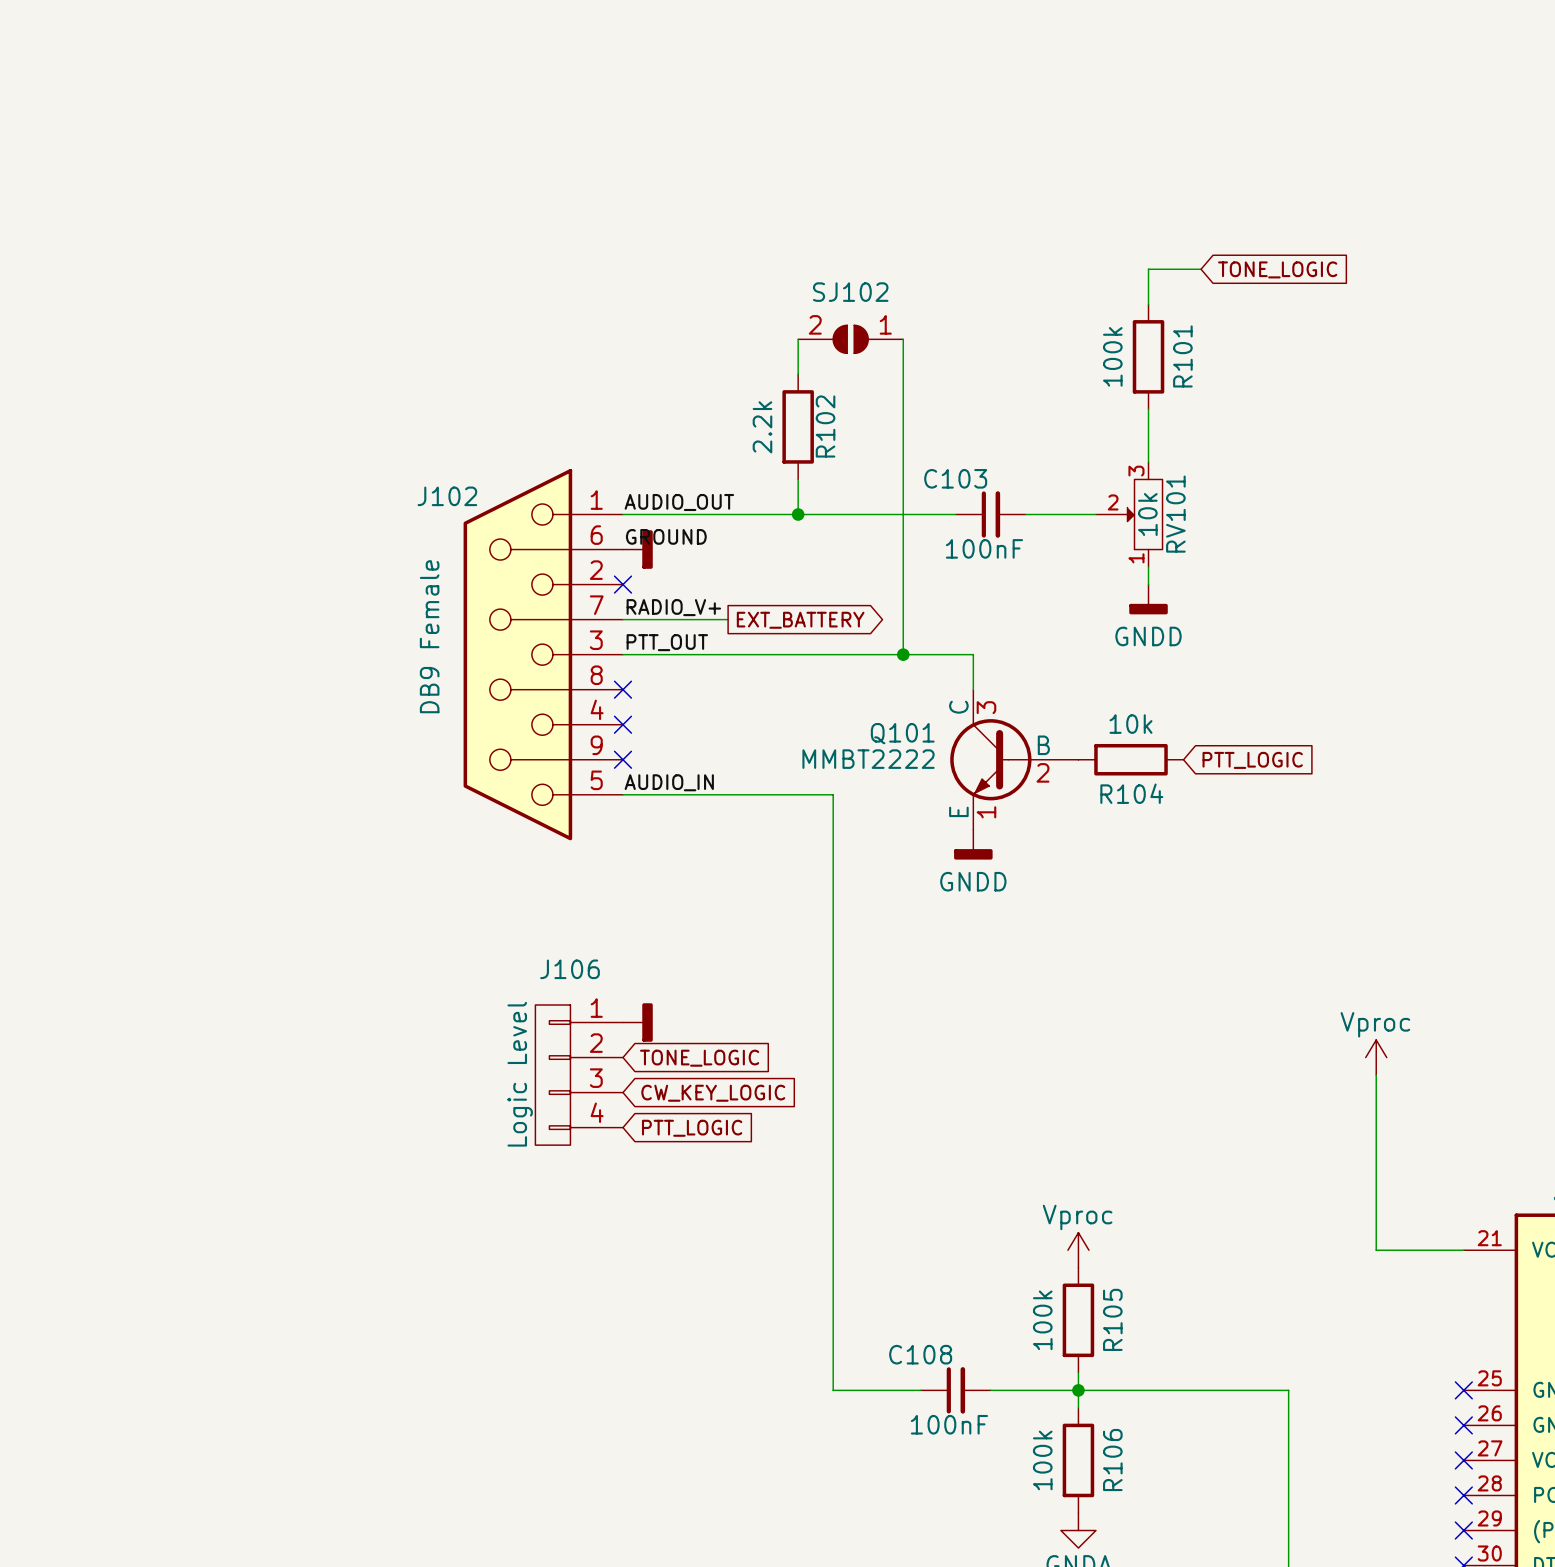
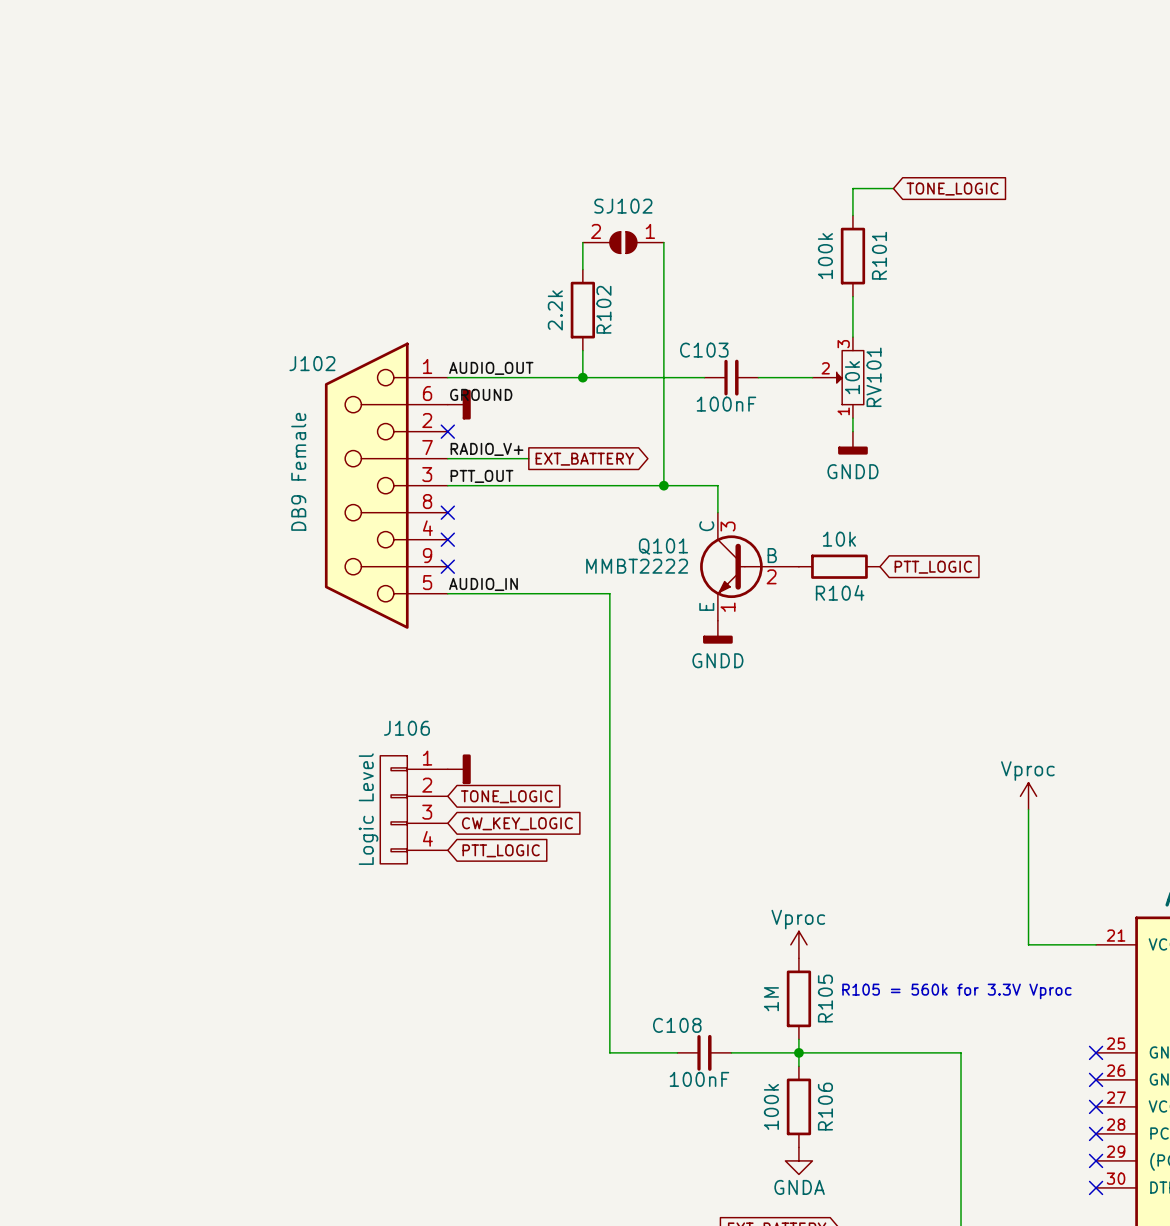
text: none -> R105 = 560k for 3.3V Vproc (956, 991)
R105 value: 100k (1042, 1320) -> 1M (771, 999)

